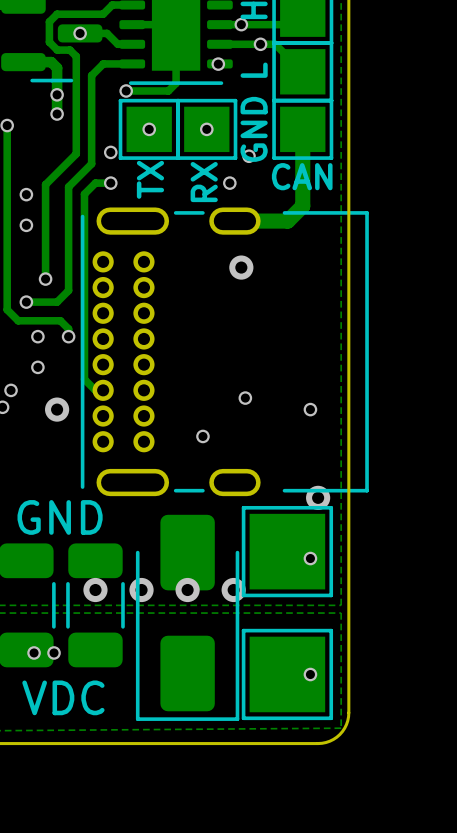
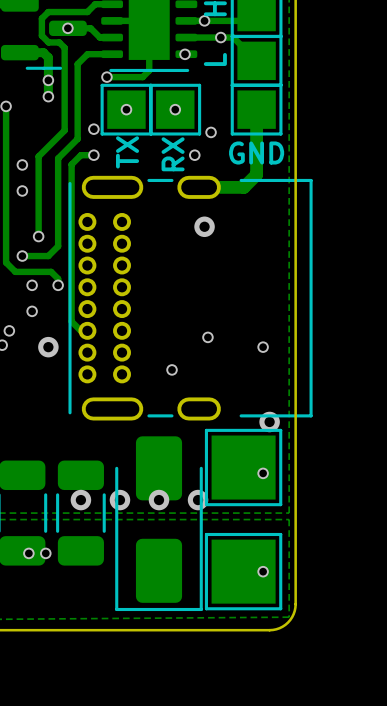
text: GND (254, 129) -> none
text: CAN (302, 176) -> GND (256, 153)
text: GND (60, 517) -> none
text: VDC (63, 697) -> none

